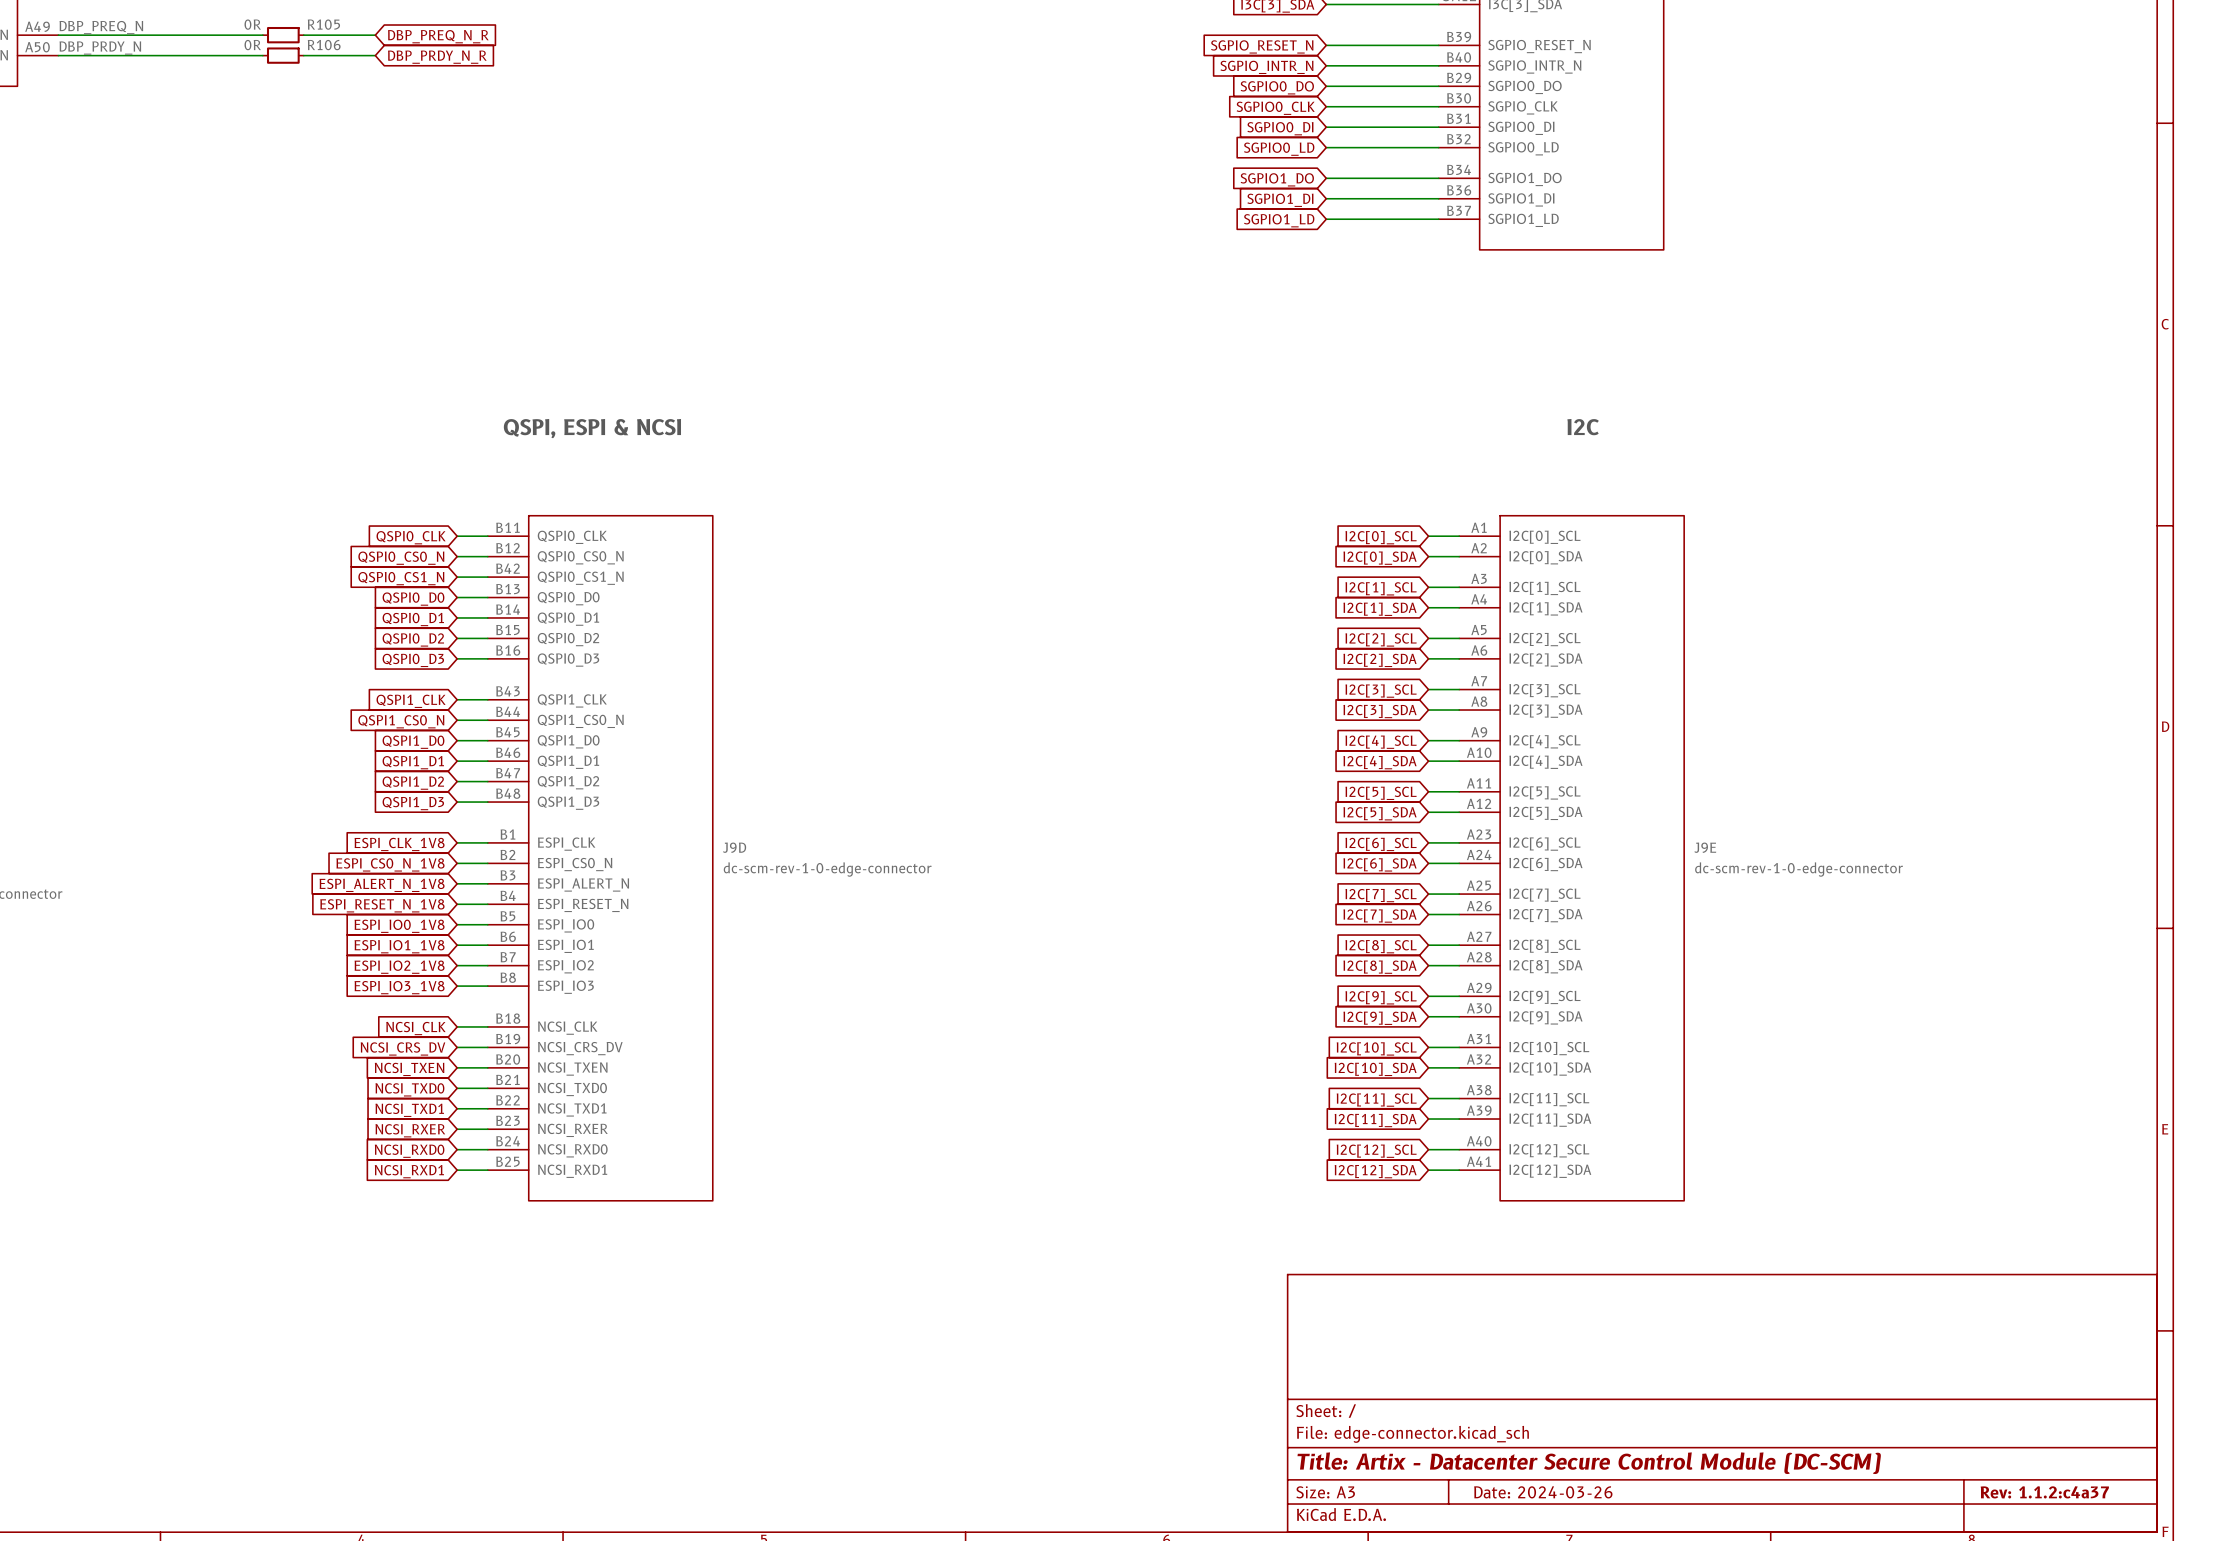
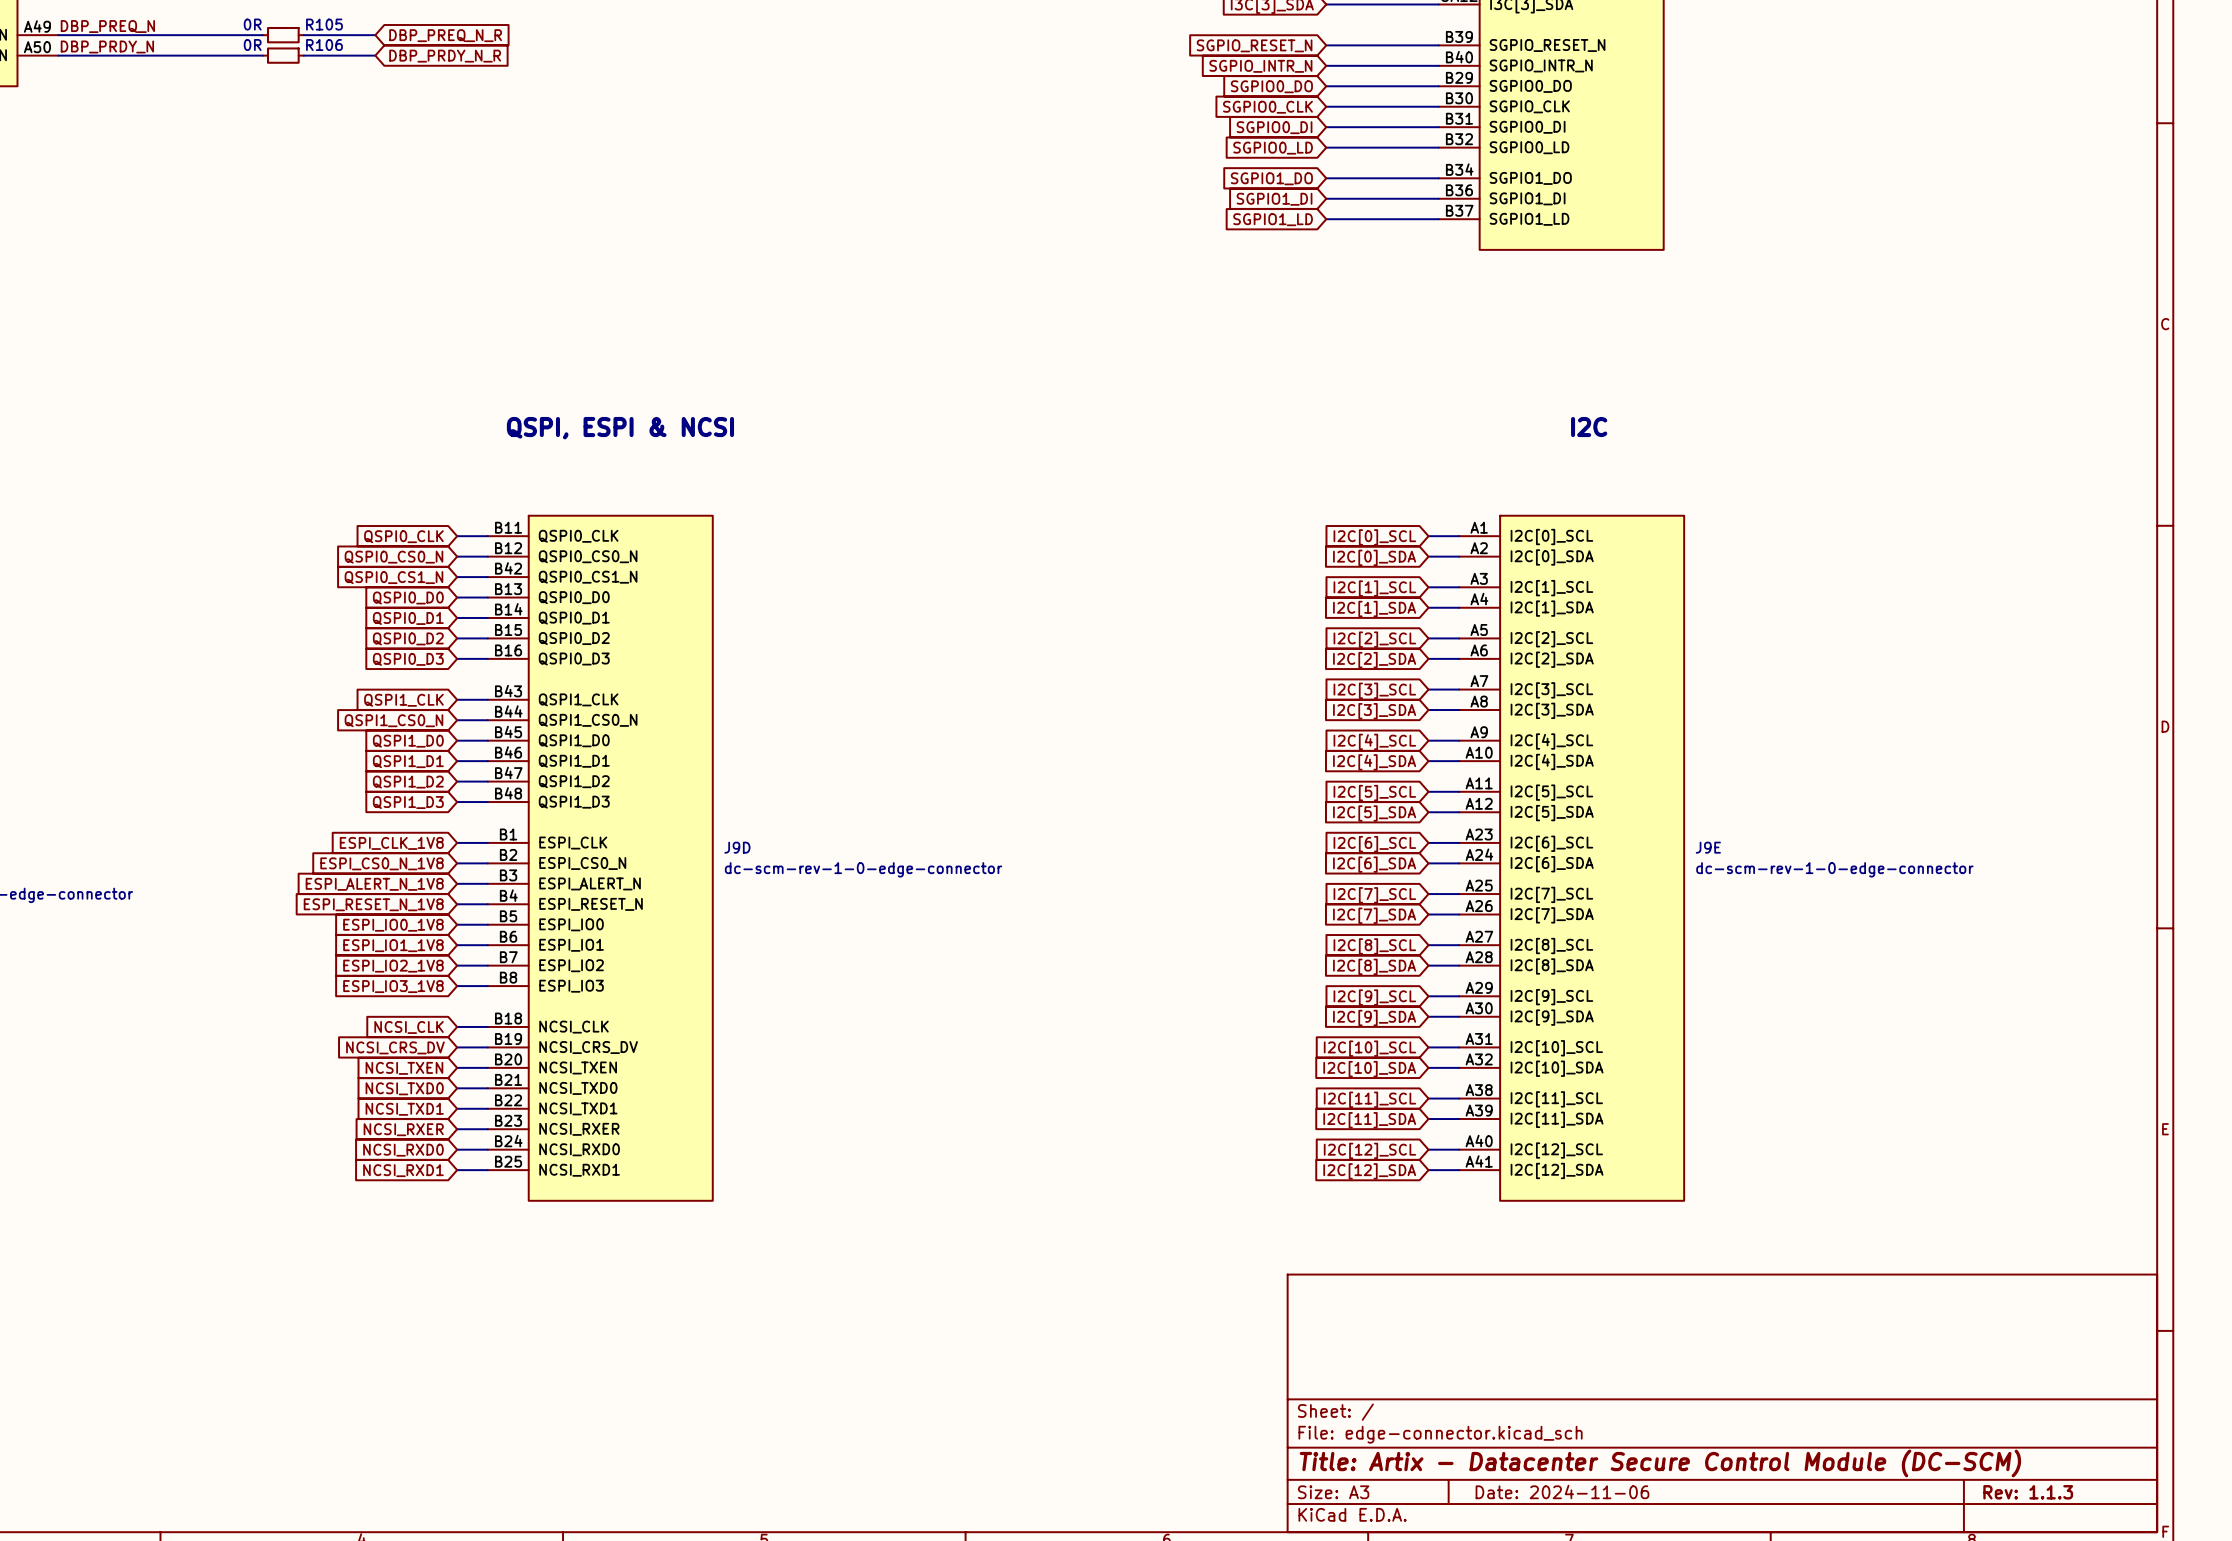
title block: Date: 2024-03-26 (1543, 1492) -> Date: 2024-11-06 (1562, 1492)
title block: Rev: 1.1.2:c4a37 (2044, 1492) -> Rev: 1.1.3 (2028, 1492)

